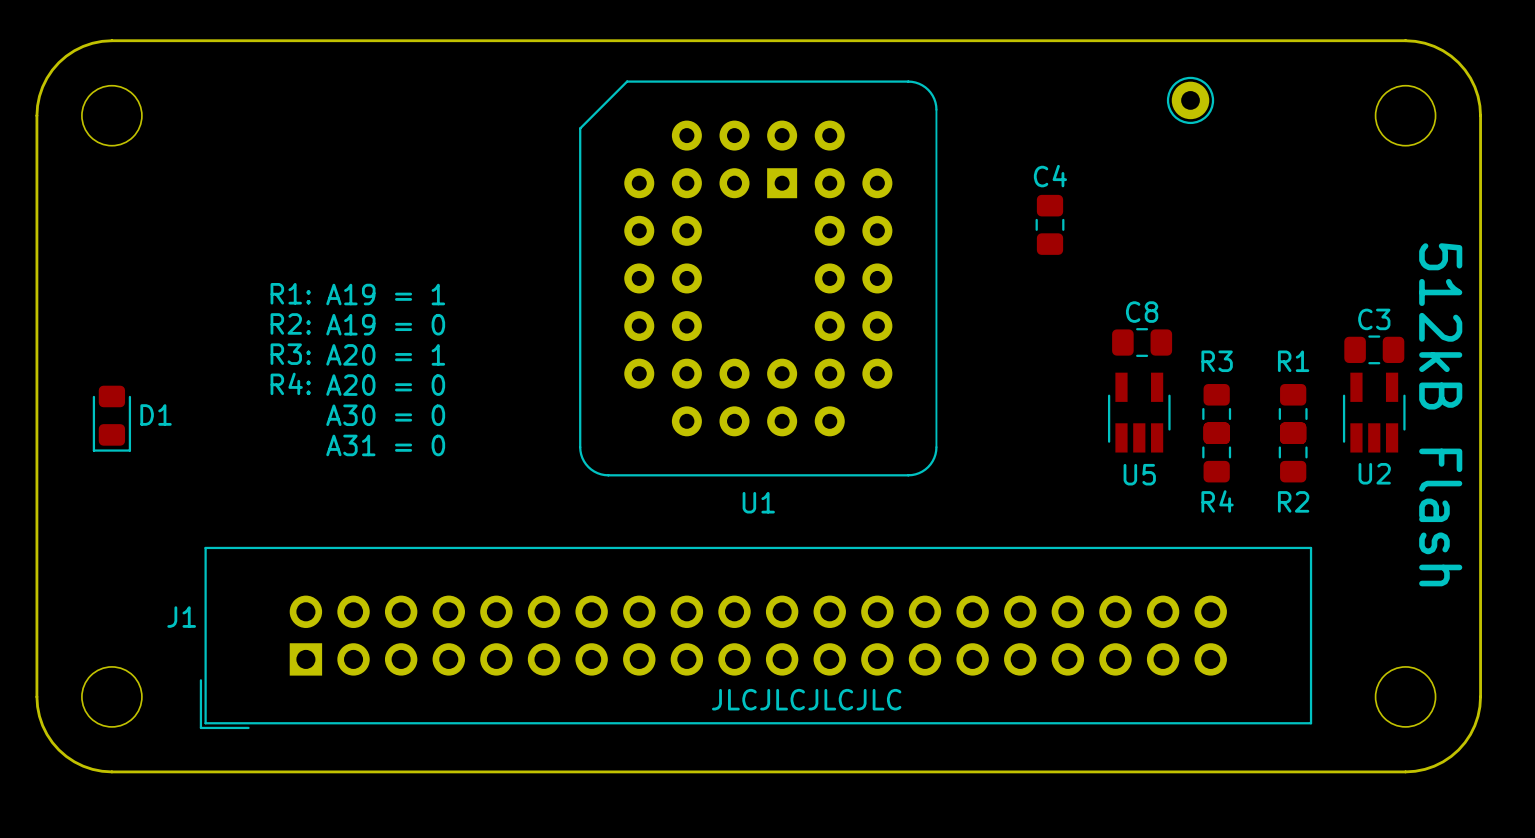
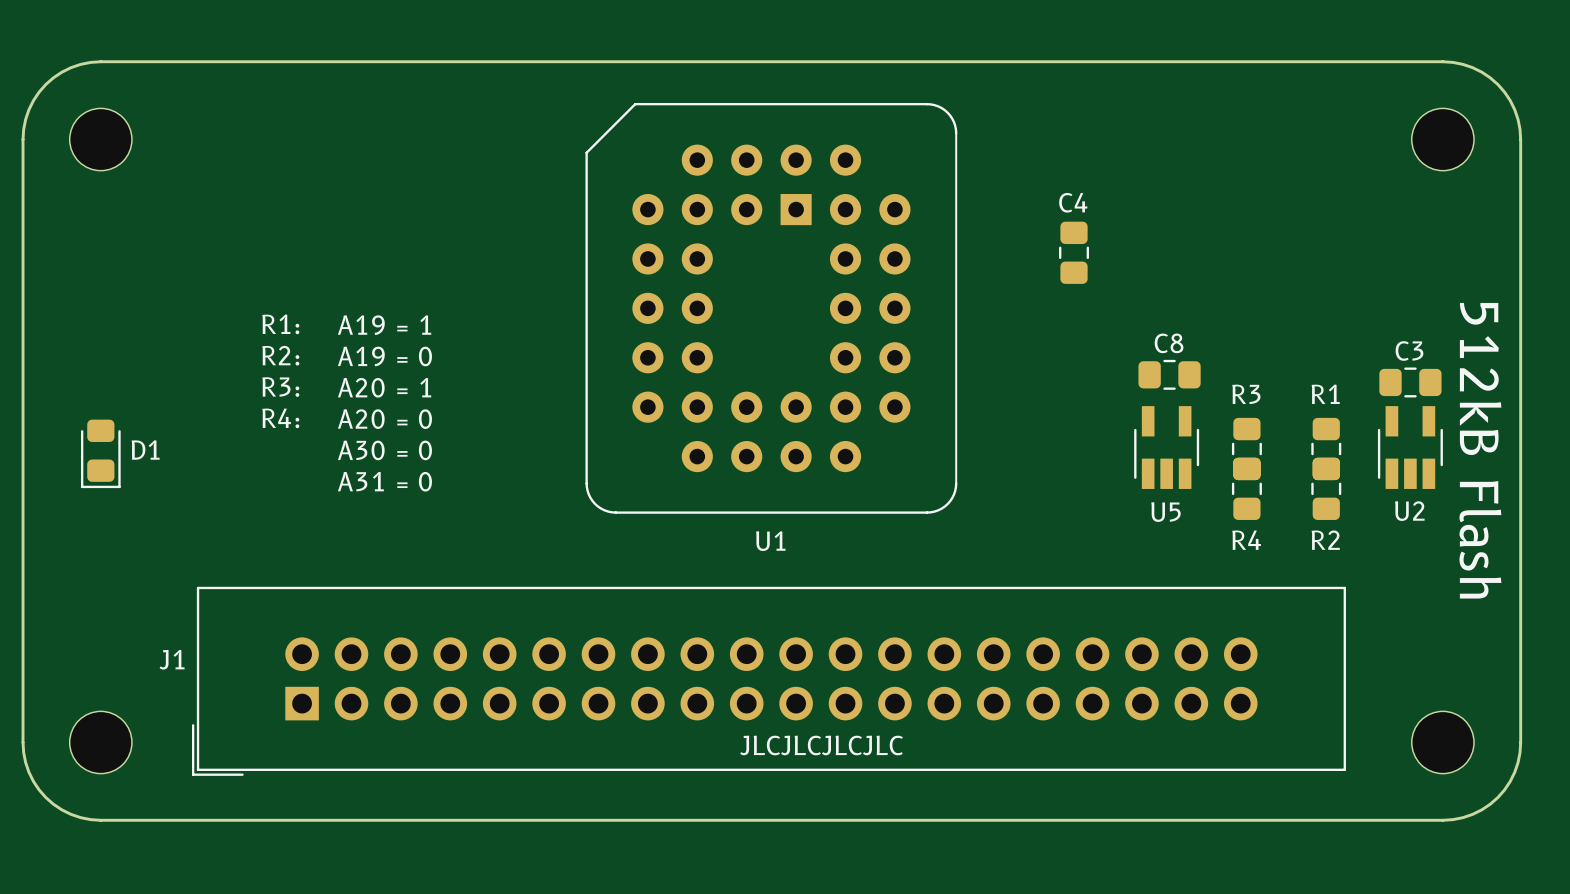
part: (1190, 100) -> none

